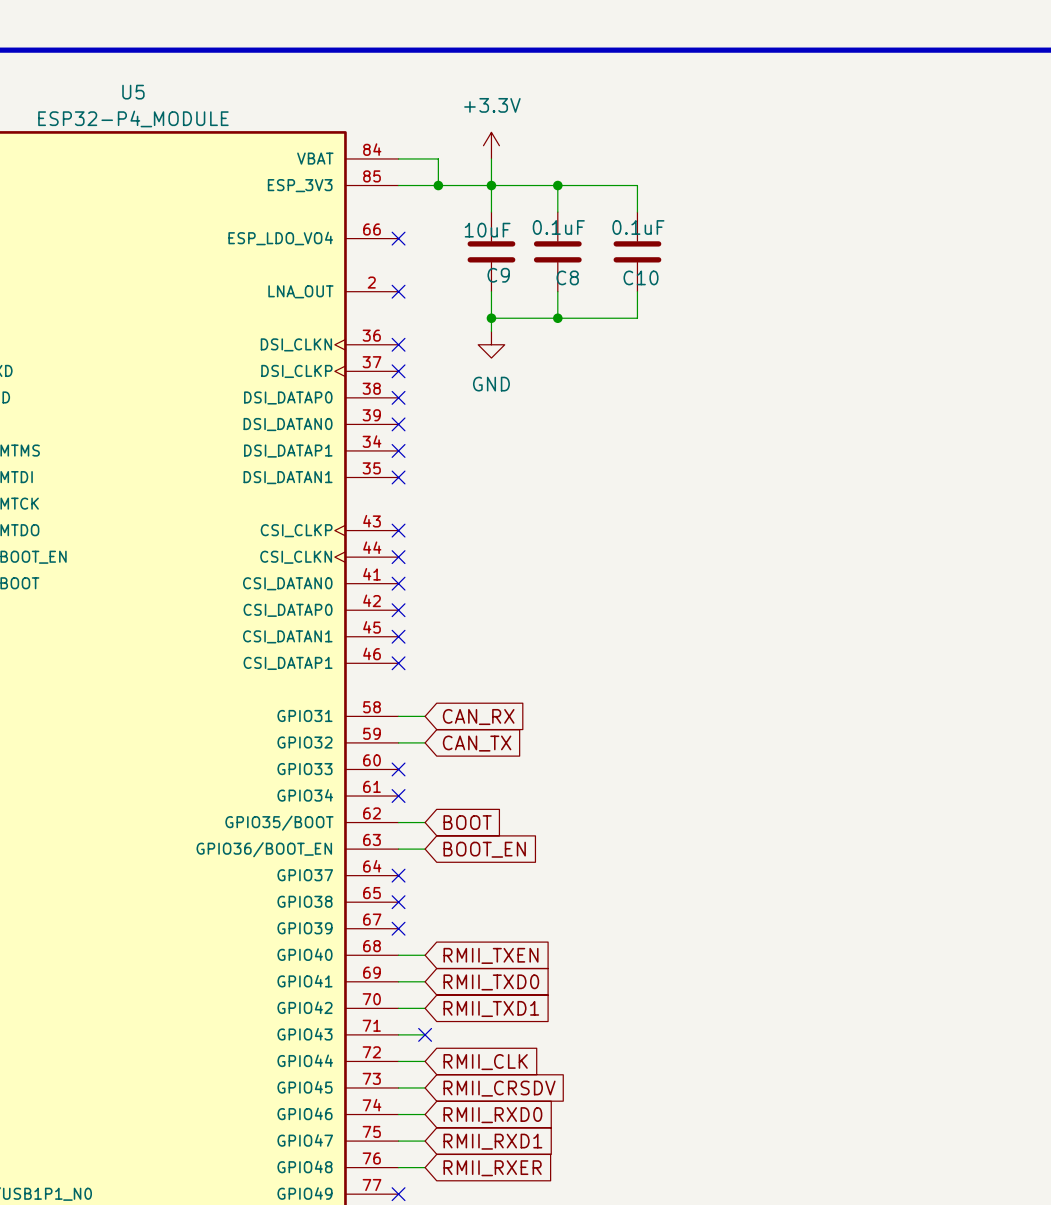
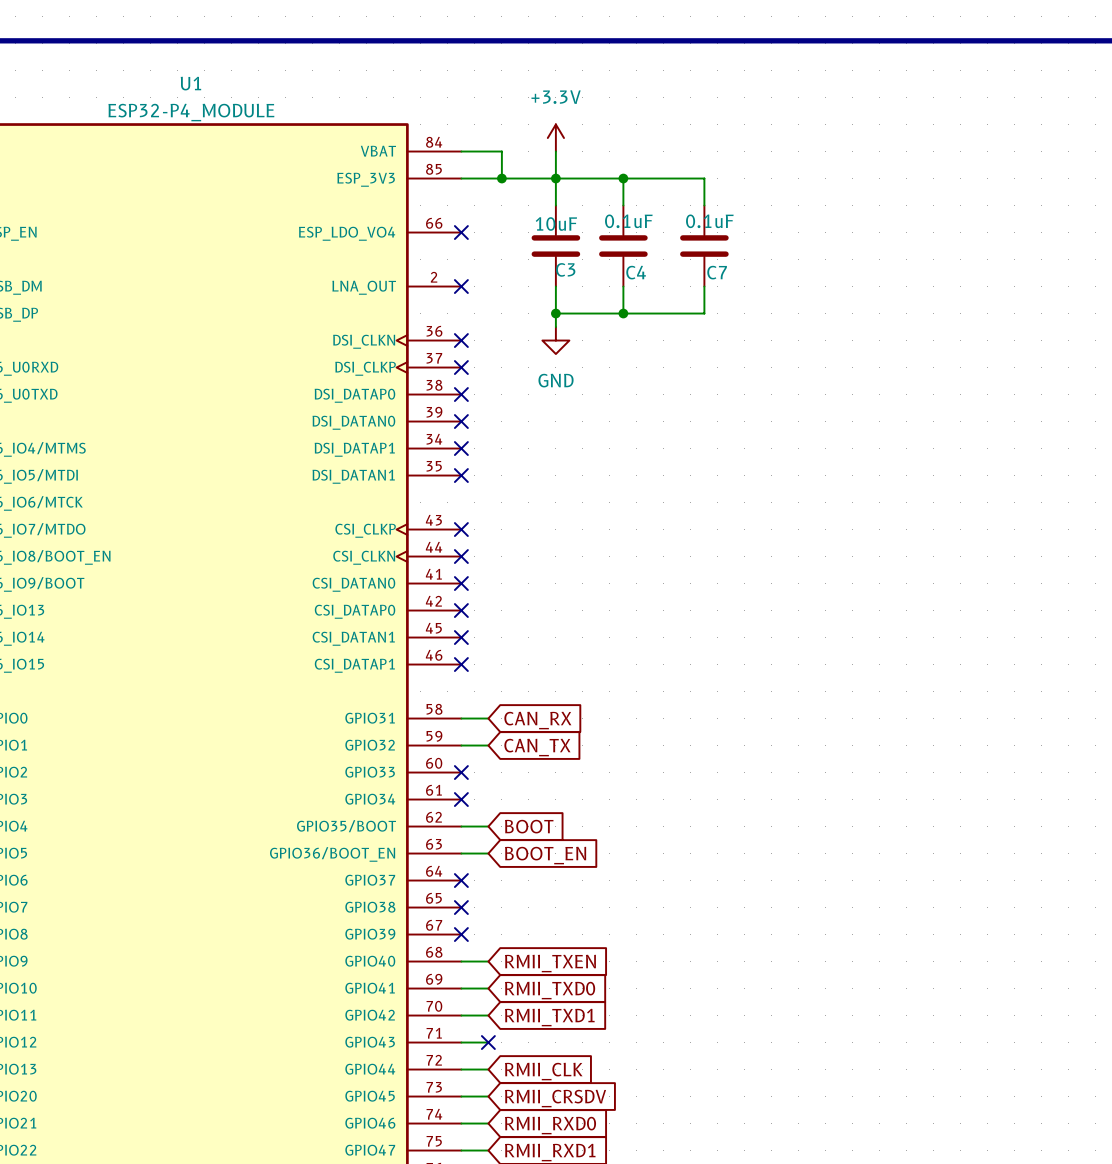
U5 name: U5 (133, 92) -> U1 (190, 83)
C9 name: C9 (498, 275) -> C3 (565, 269)
C8 name: C8 (567, 277) -> C4 (636, 272)
C10 name: C10 (641, 277) -> C7 (717, 272)

